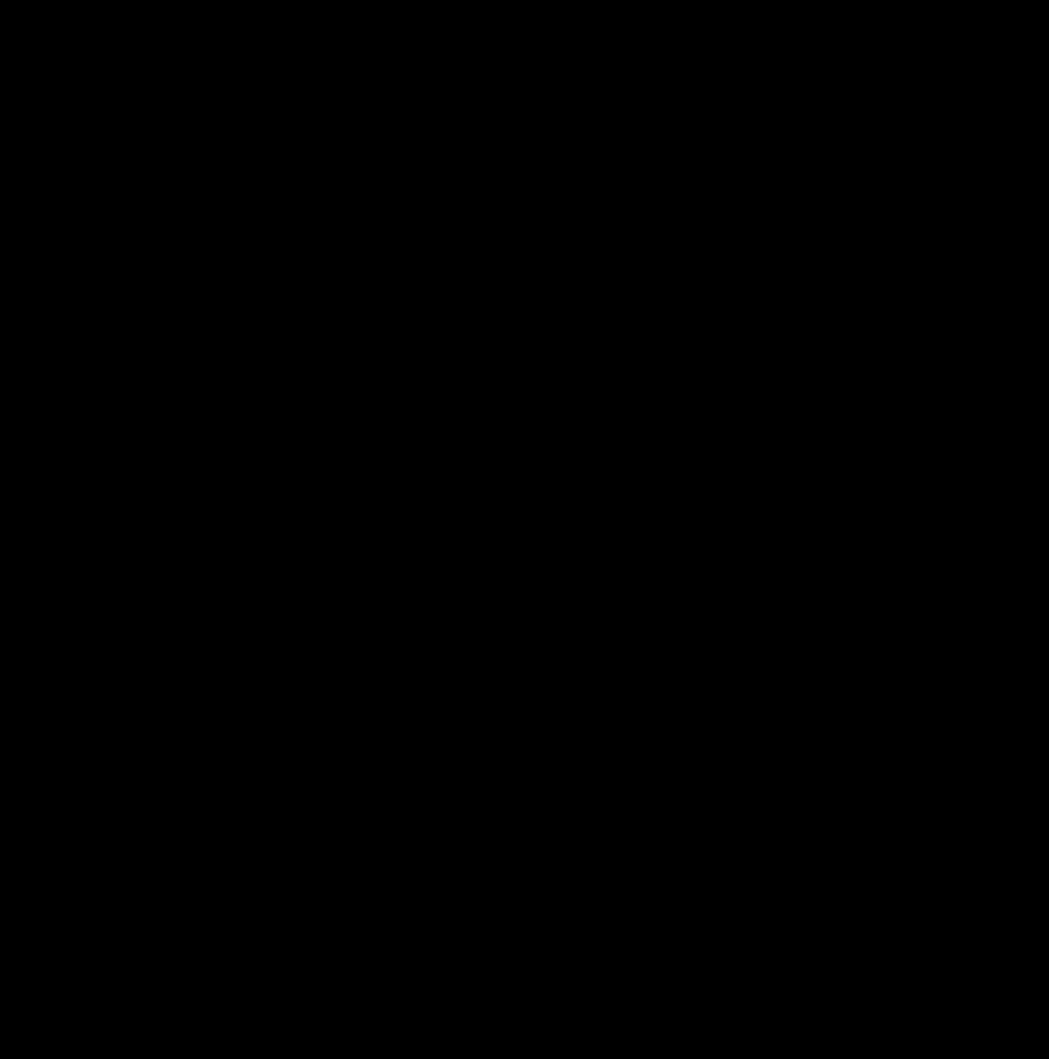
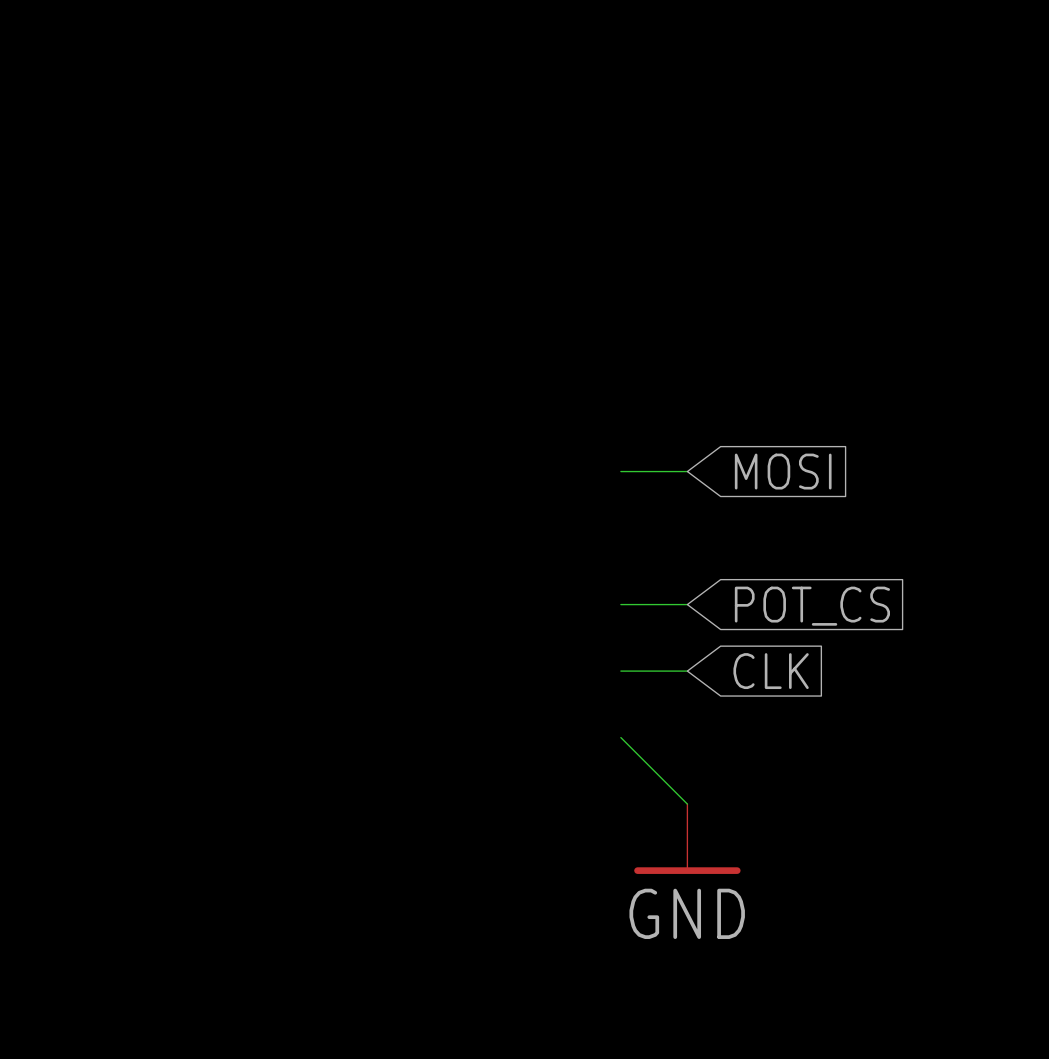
wire: none -> (620, 471) (687, 471)
global label: none -> MOSI (783, 471)
wire: none -> (620, 604) (687, 604)
global label: none -> POT_CS (812, 606)
wire: none -> (620, 671) (687, 671)
global label: none -> CLK (771, 671)
wire: none -> (620, 737) (687, 804)
power symbol: none -> GND (687, 839)

